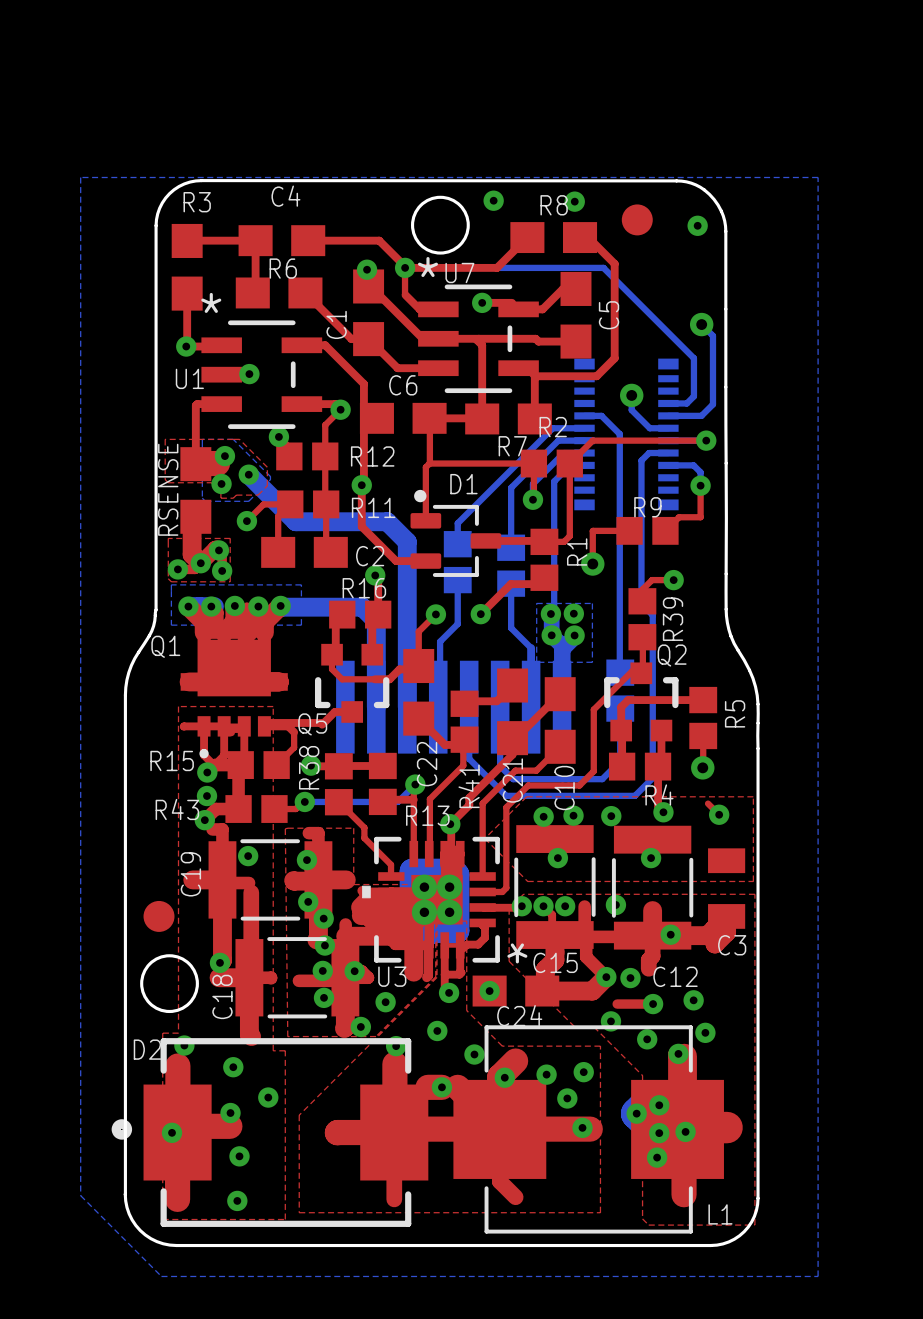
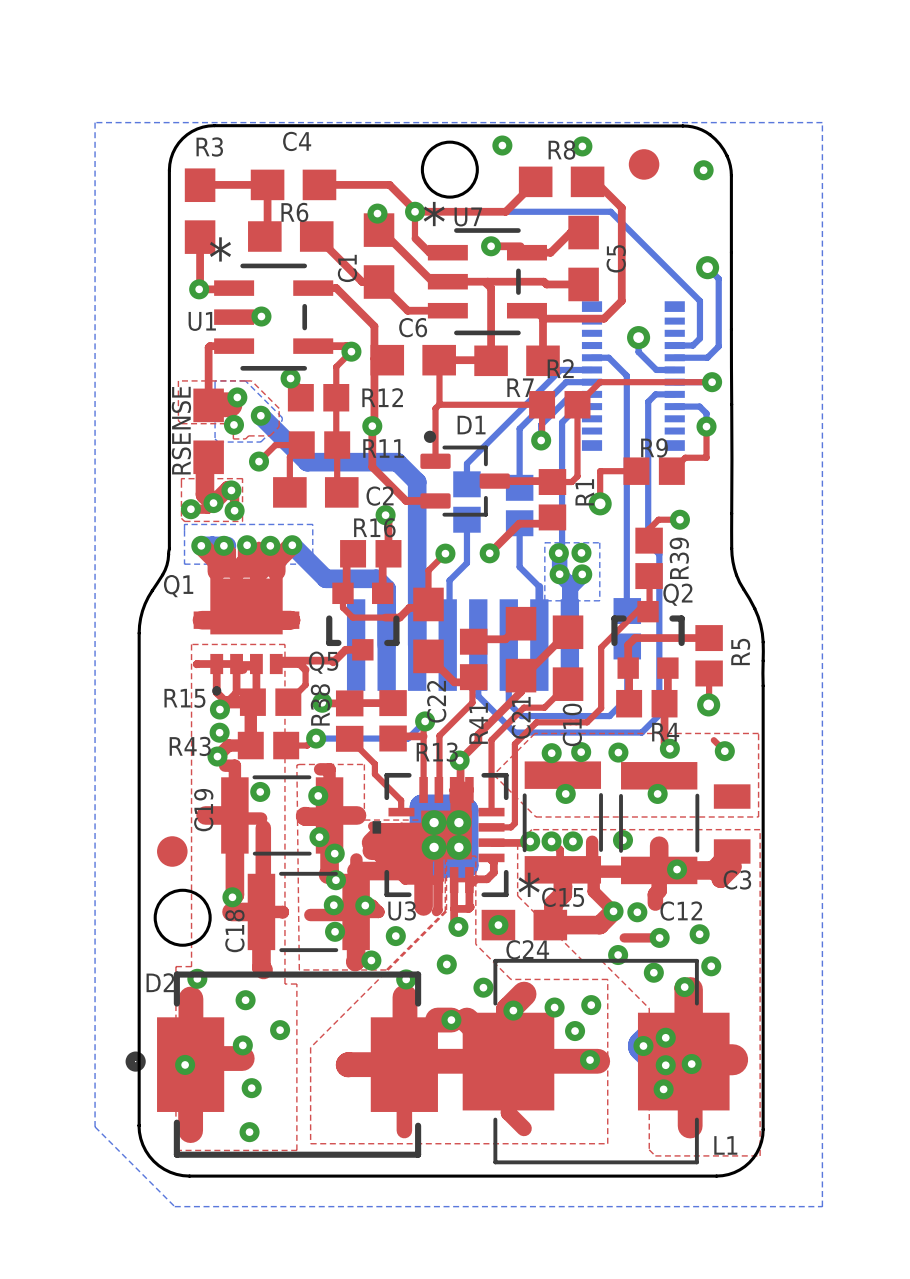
bottom track: (281, 607) (362, 607) (376, 621) (376, 650) -> (293, 546) (325, 578) (376, 578) (386, 588)

